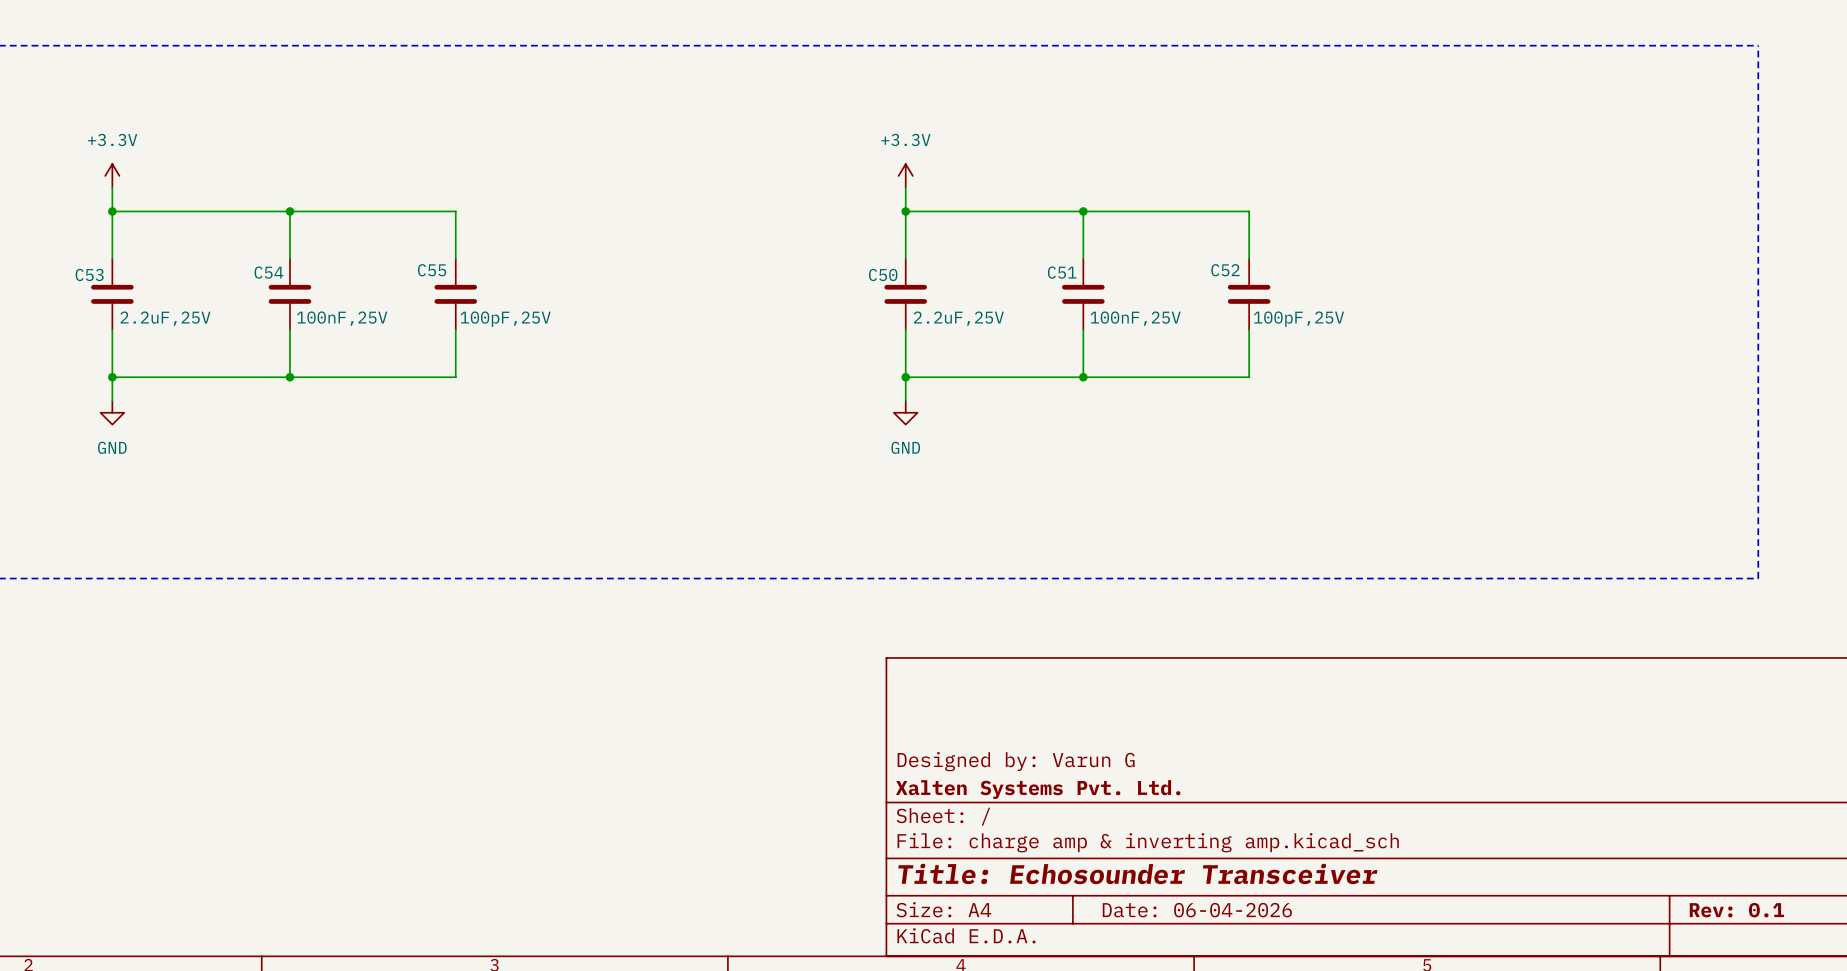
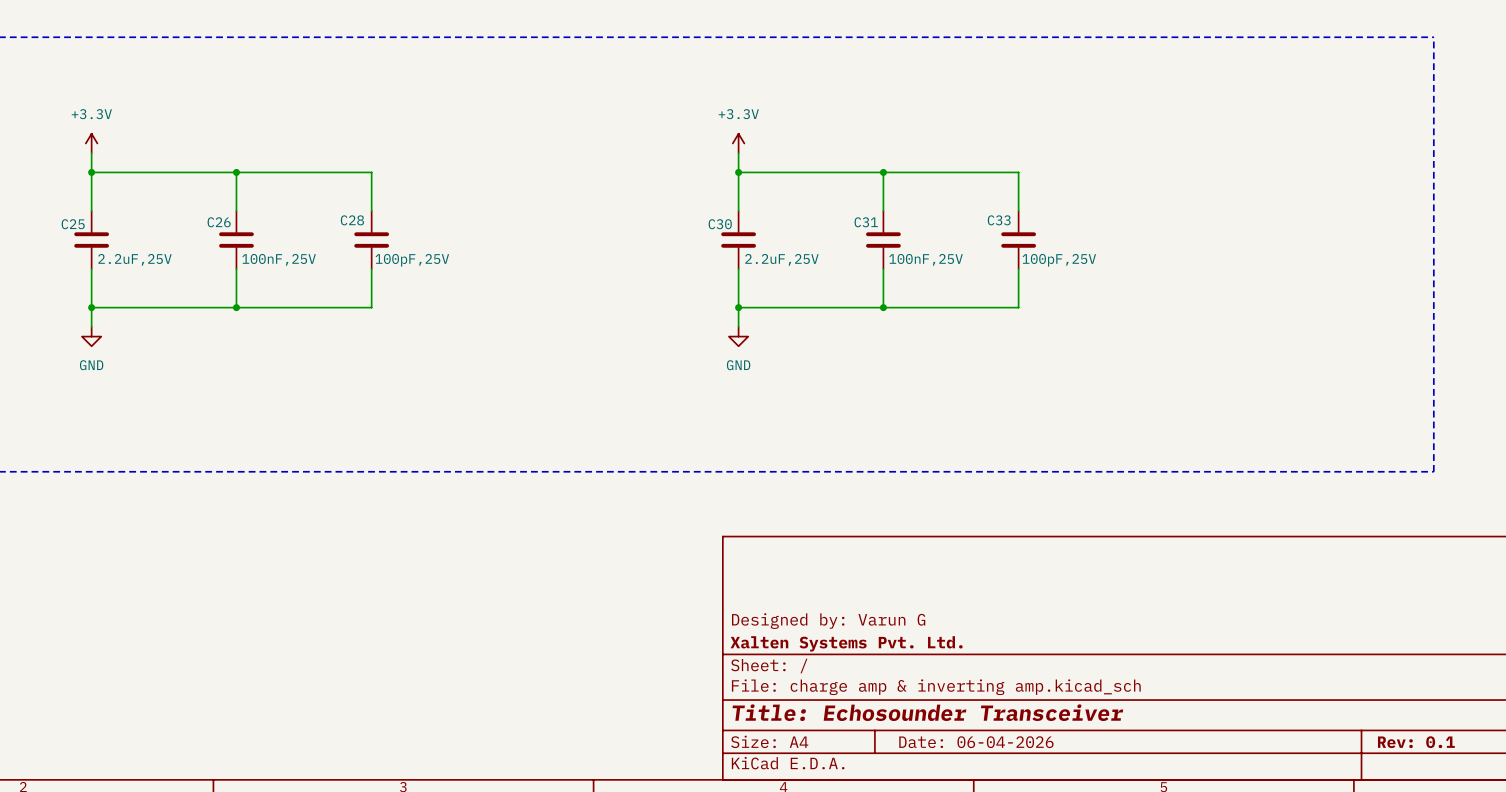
C55 name: C55 (432, 270) -> C28 (352, 220)
C52 name: C52 (1225, 270) -> C33 (999, 220)
C54 name: C54 (268, 272) -> C26 (219, 222)
C51 name: C51 (1062, 272) -> C31 (866, 222)
C53 name: C53 (89, 274) -> C25 (73, 224)
C50 name: C50 (883, 274) -> C30 (720, 224)

